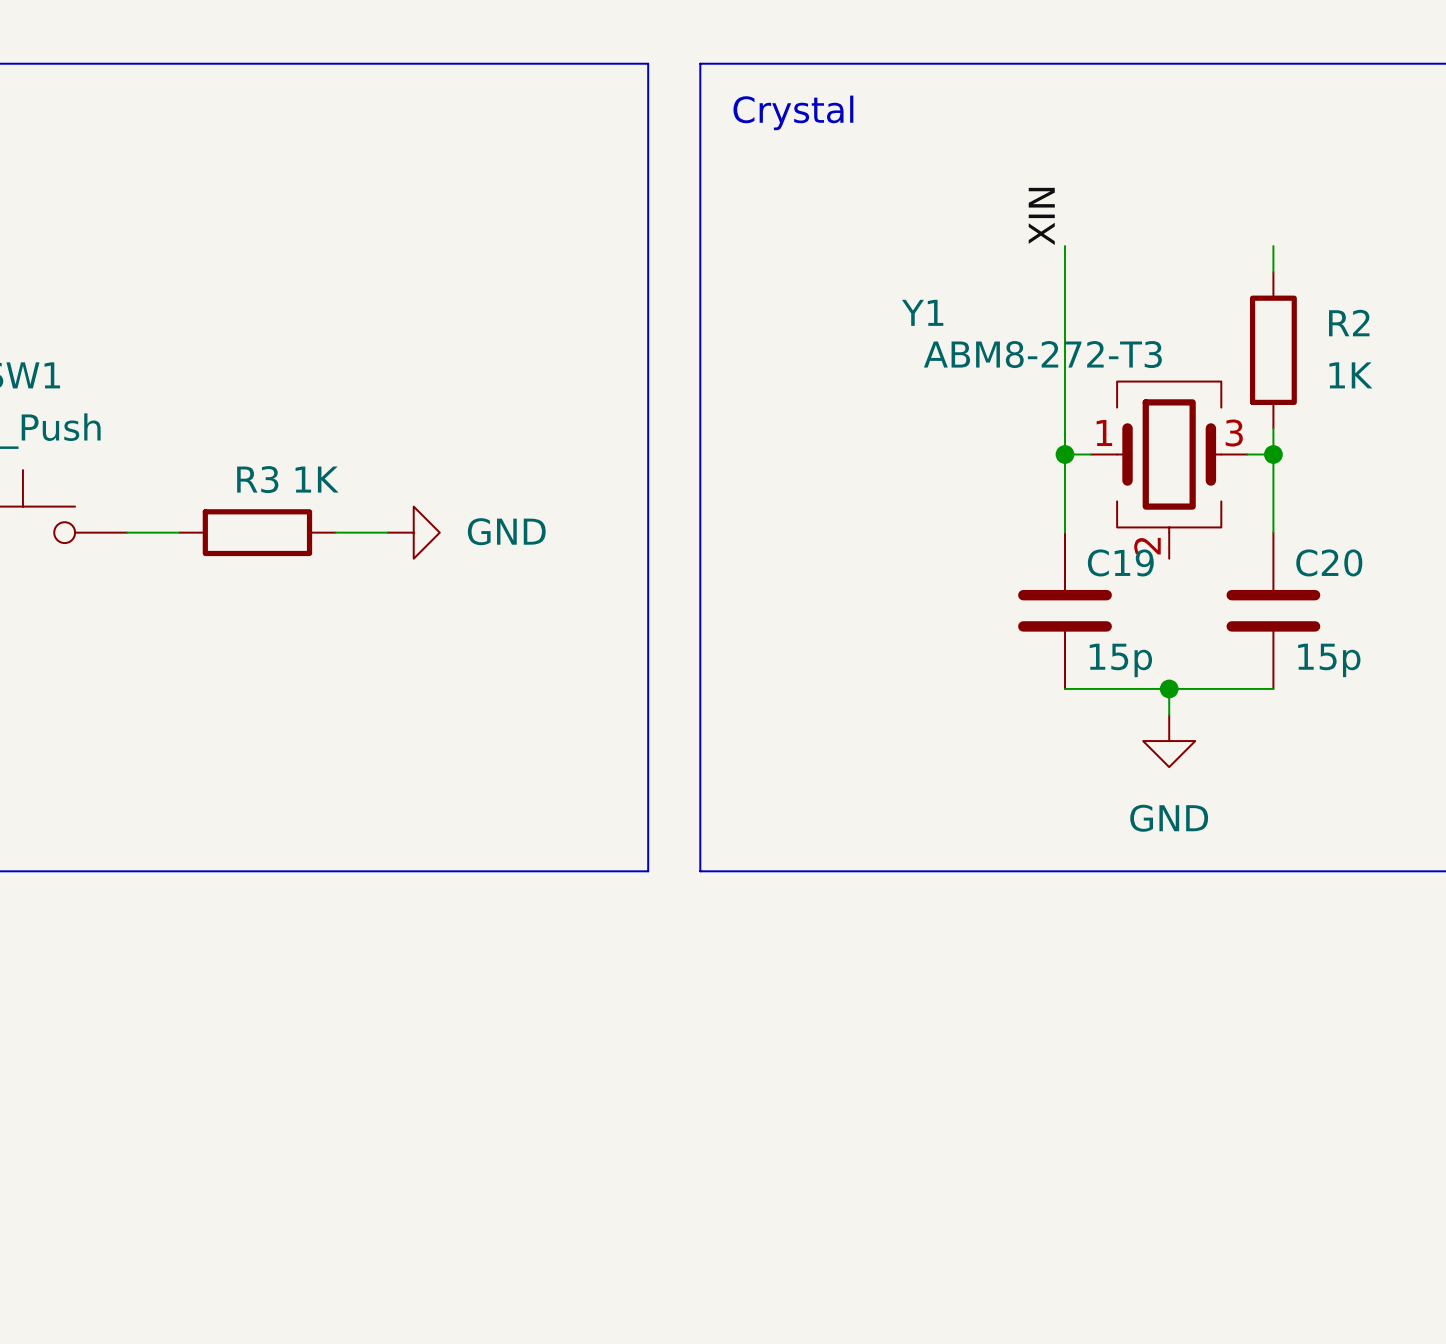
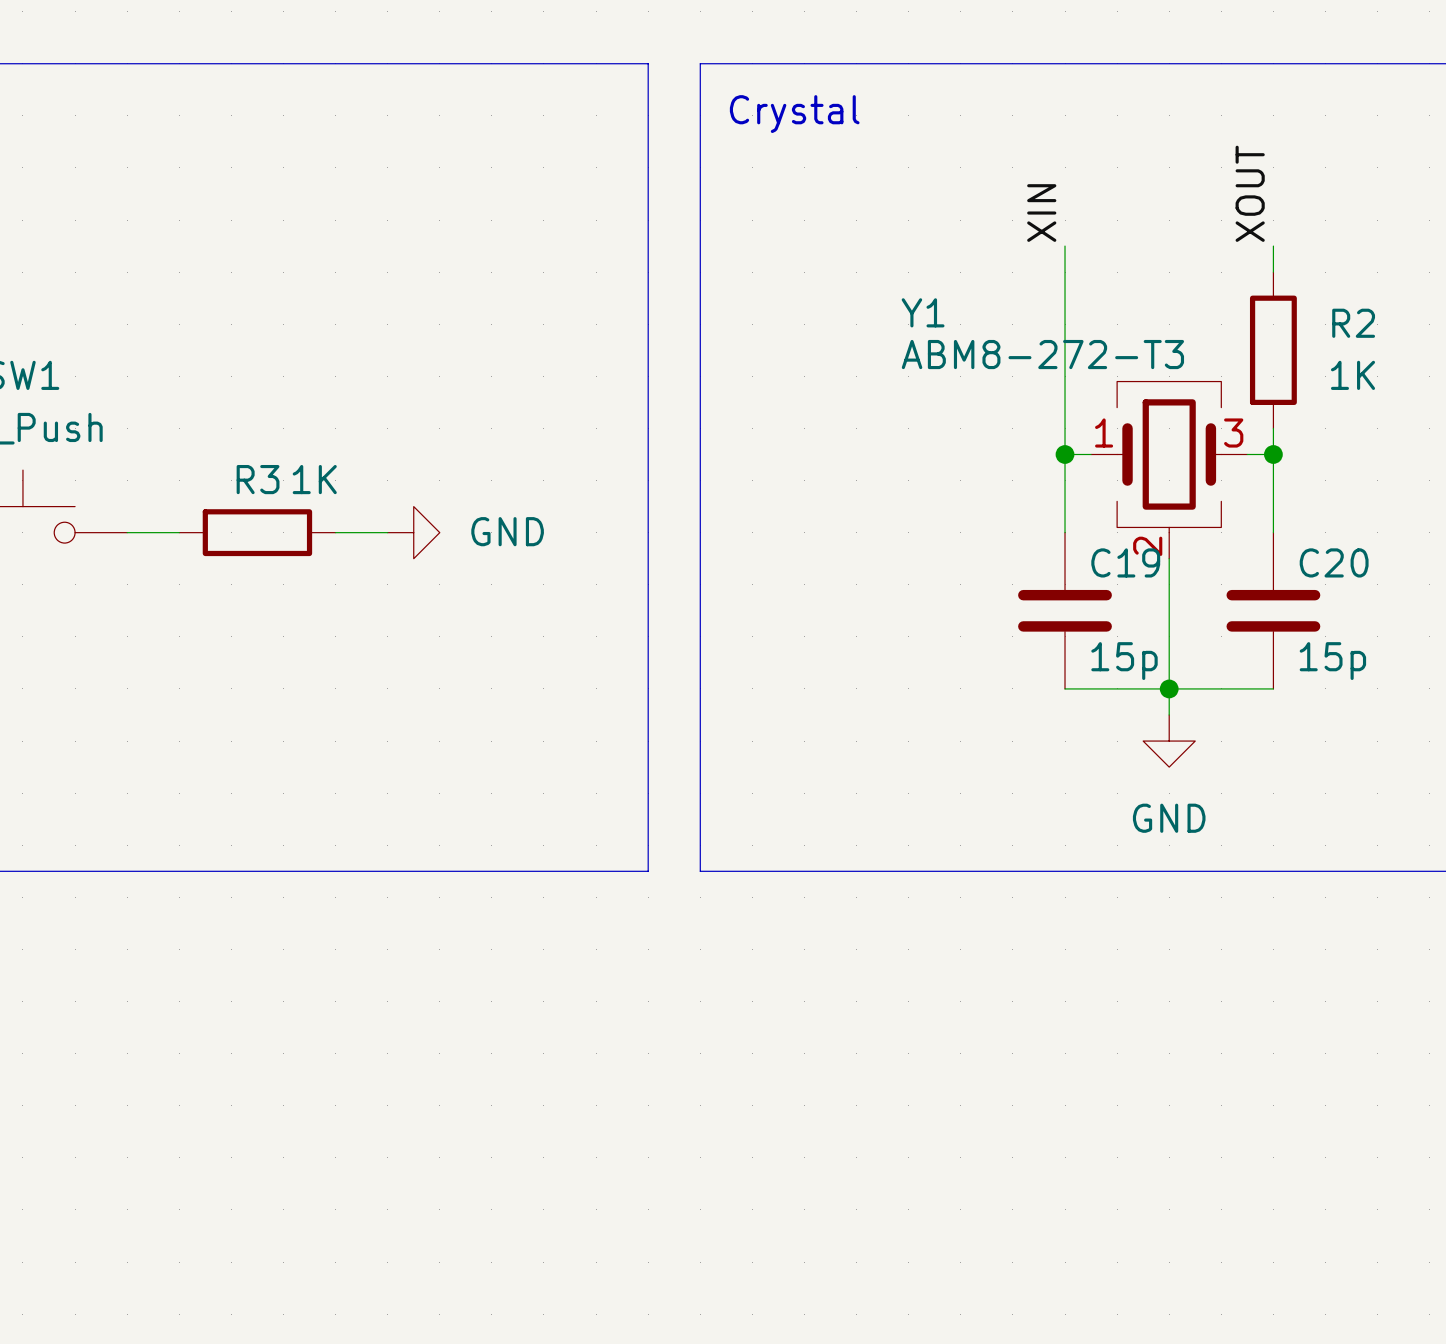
label: none -> XOUT (1250, 193)
wire: none -> (1169, 558) (1169, 688)

